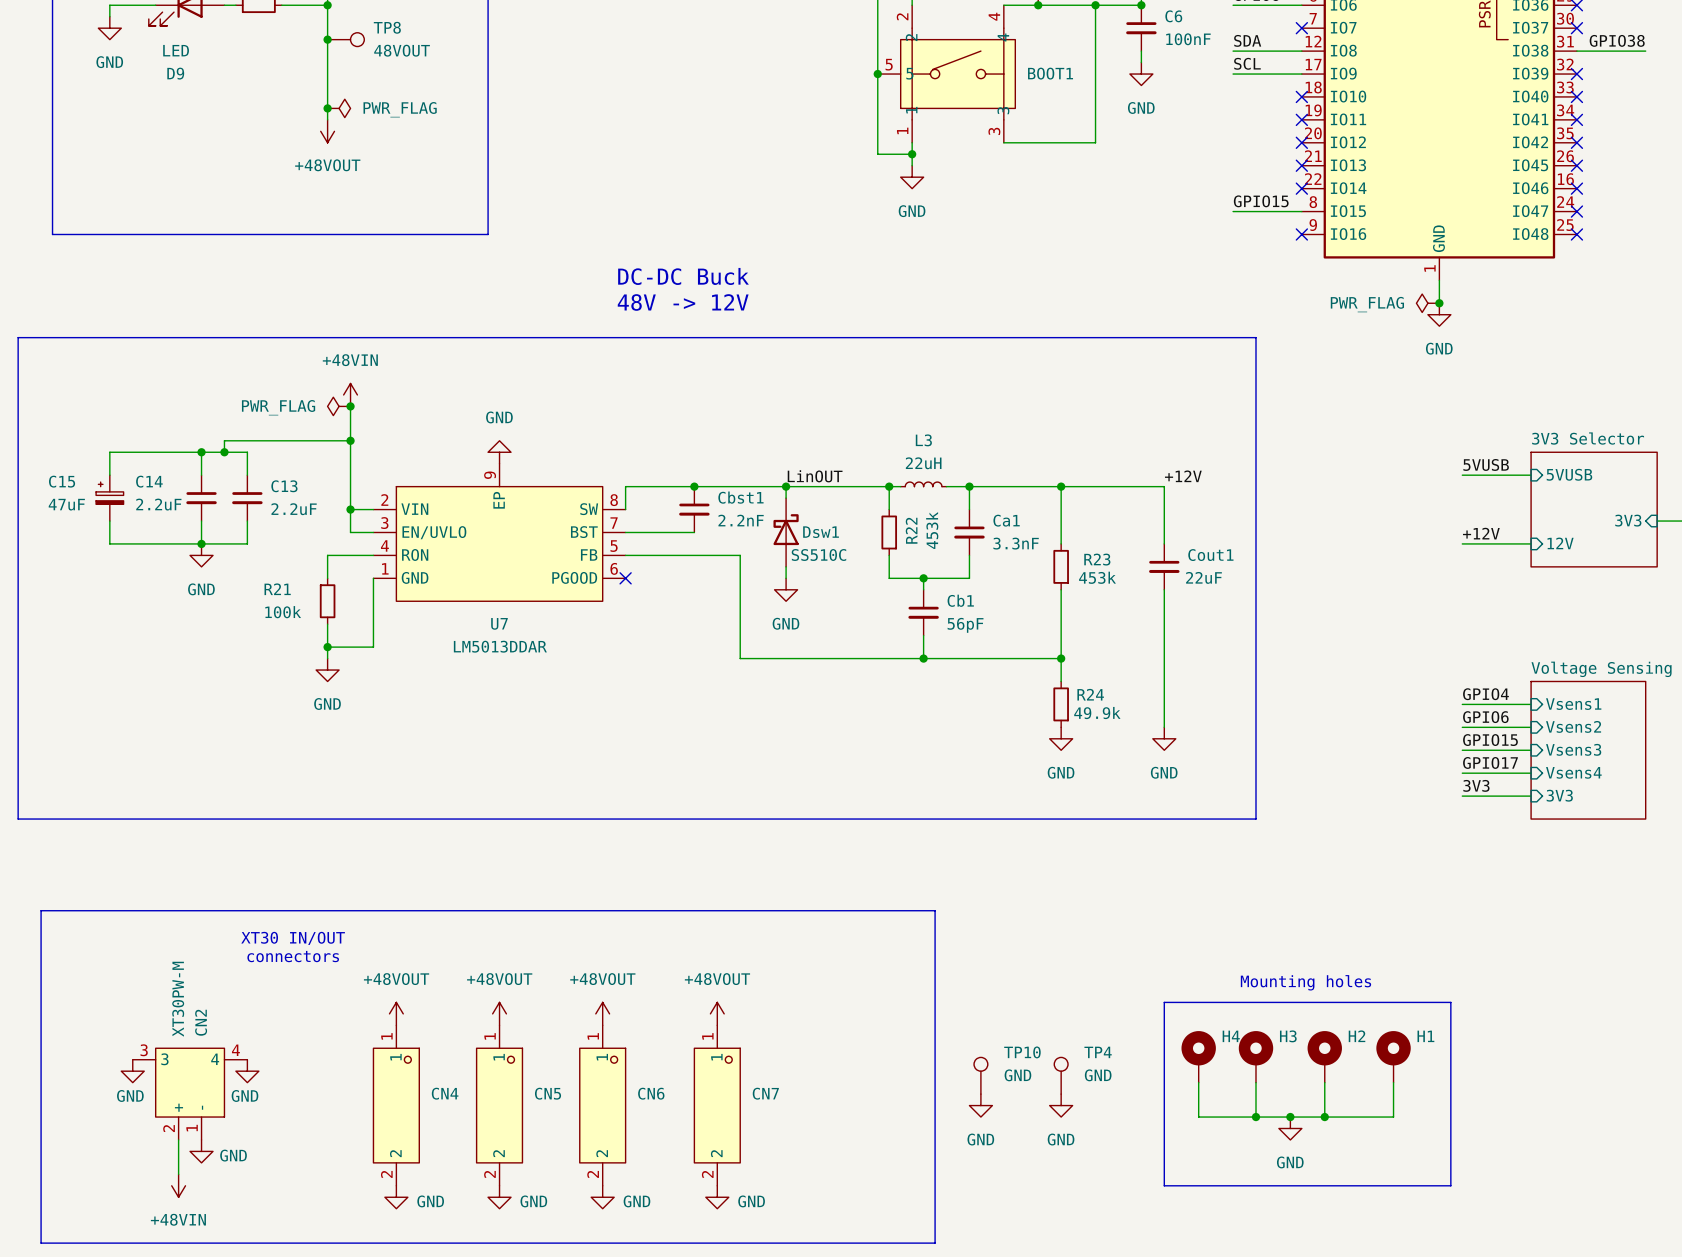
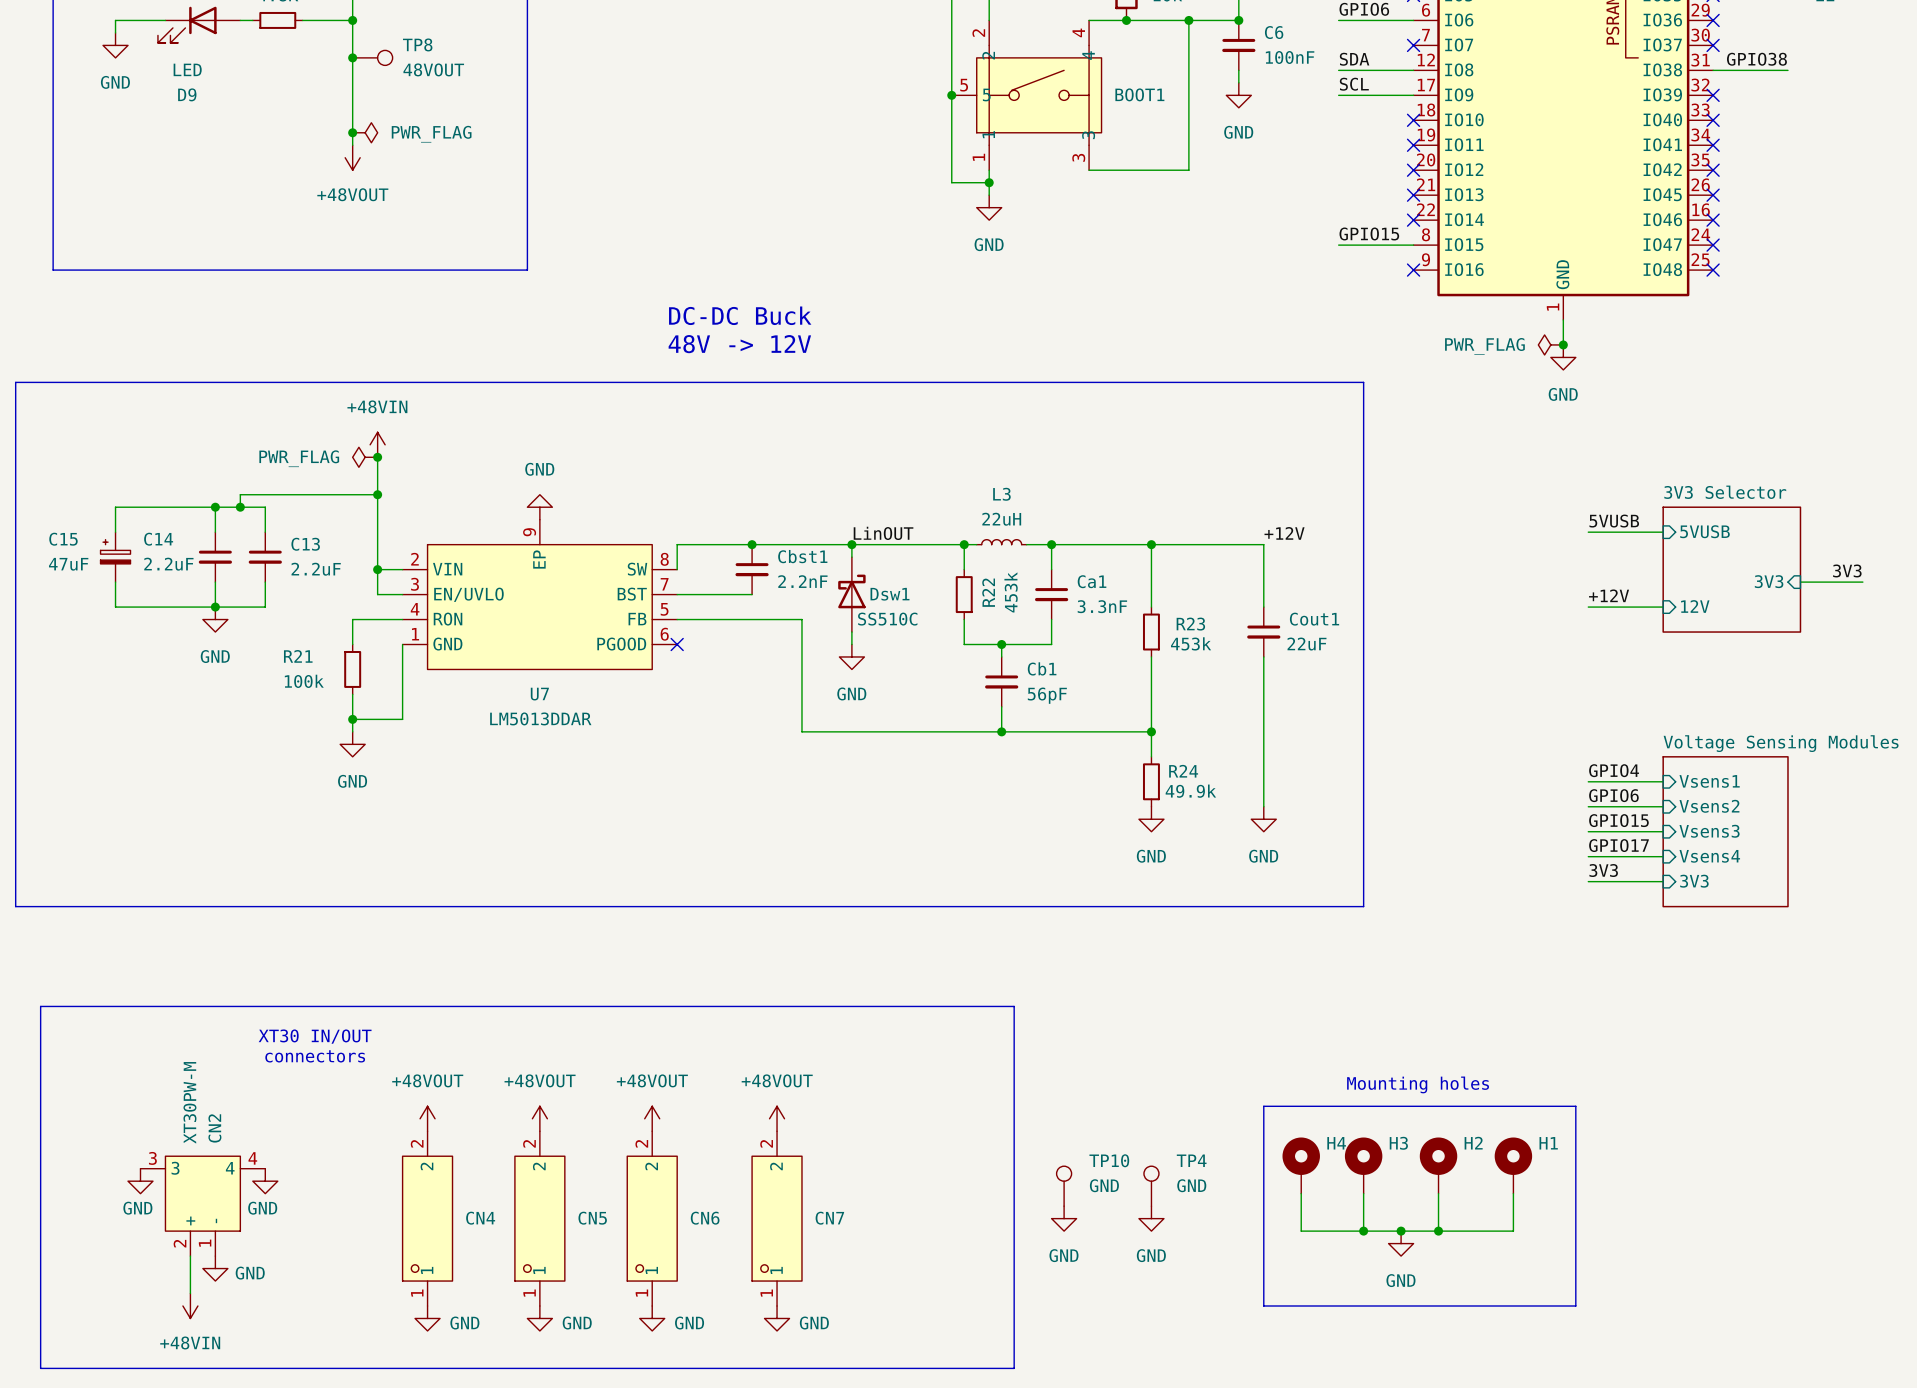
CN4 rotation: 0° (396, 1105) -> 180° (427, 1218)
CN5 rotation: 0° (499, 1105) -> 180° (539, 1218)
CN6 rotation: 0° (602, 1105) -> 180° (652, 1218)
CN7 rotation: 0° (717, 1105) -> 180° (777, 1218)

